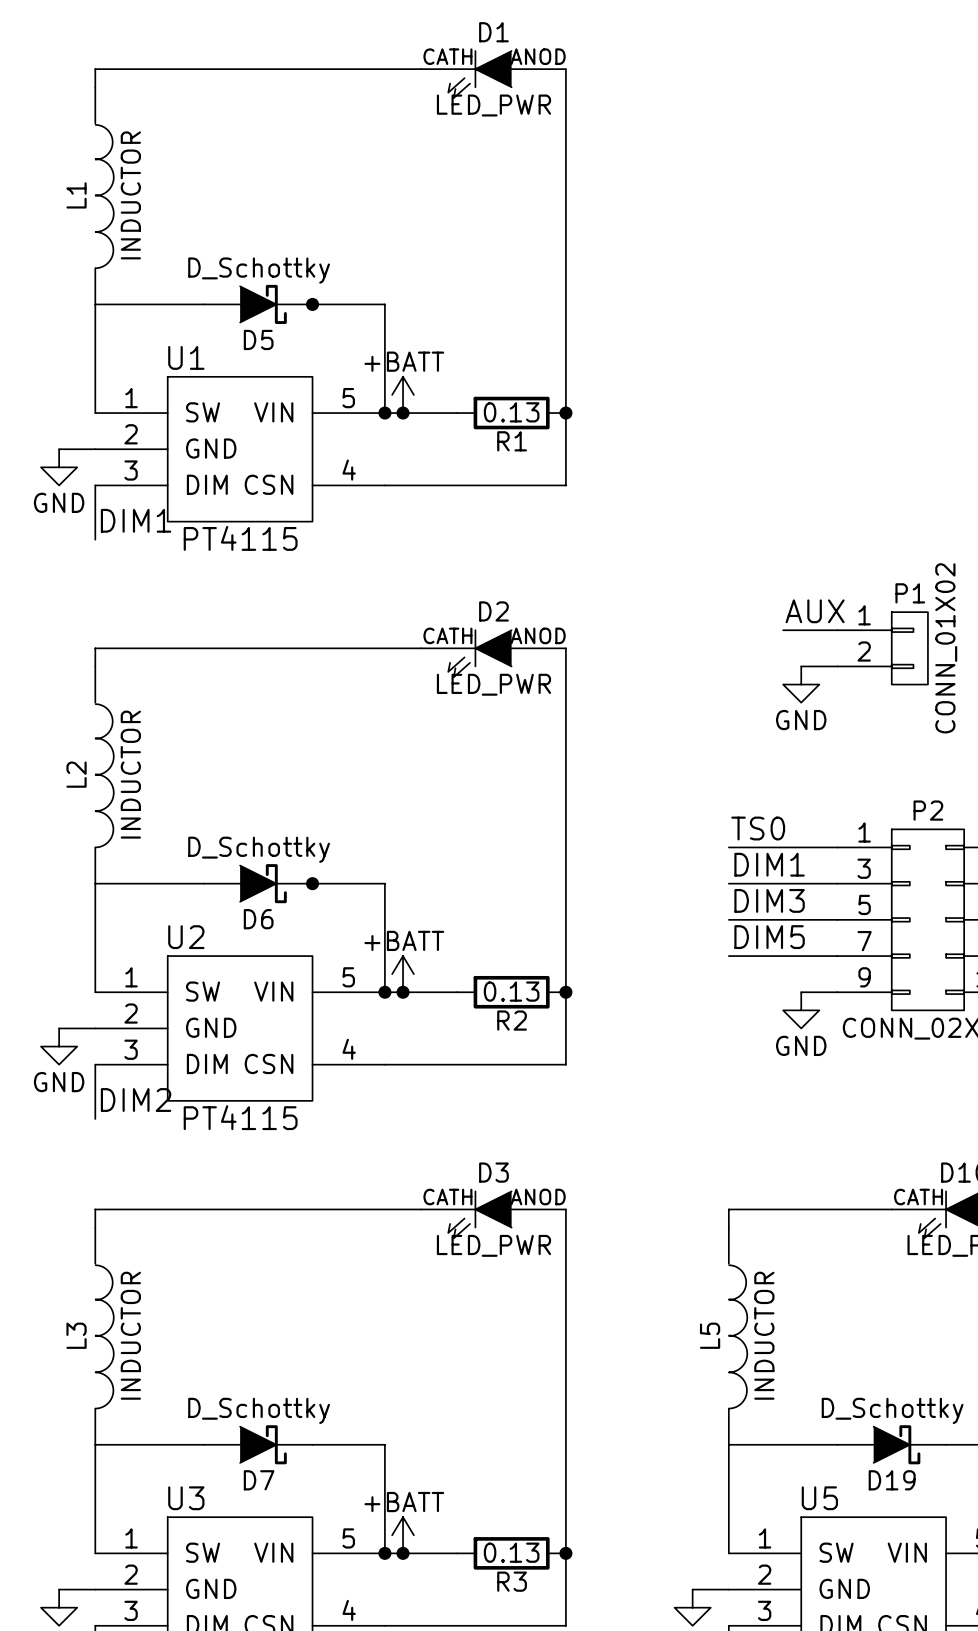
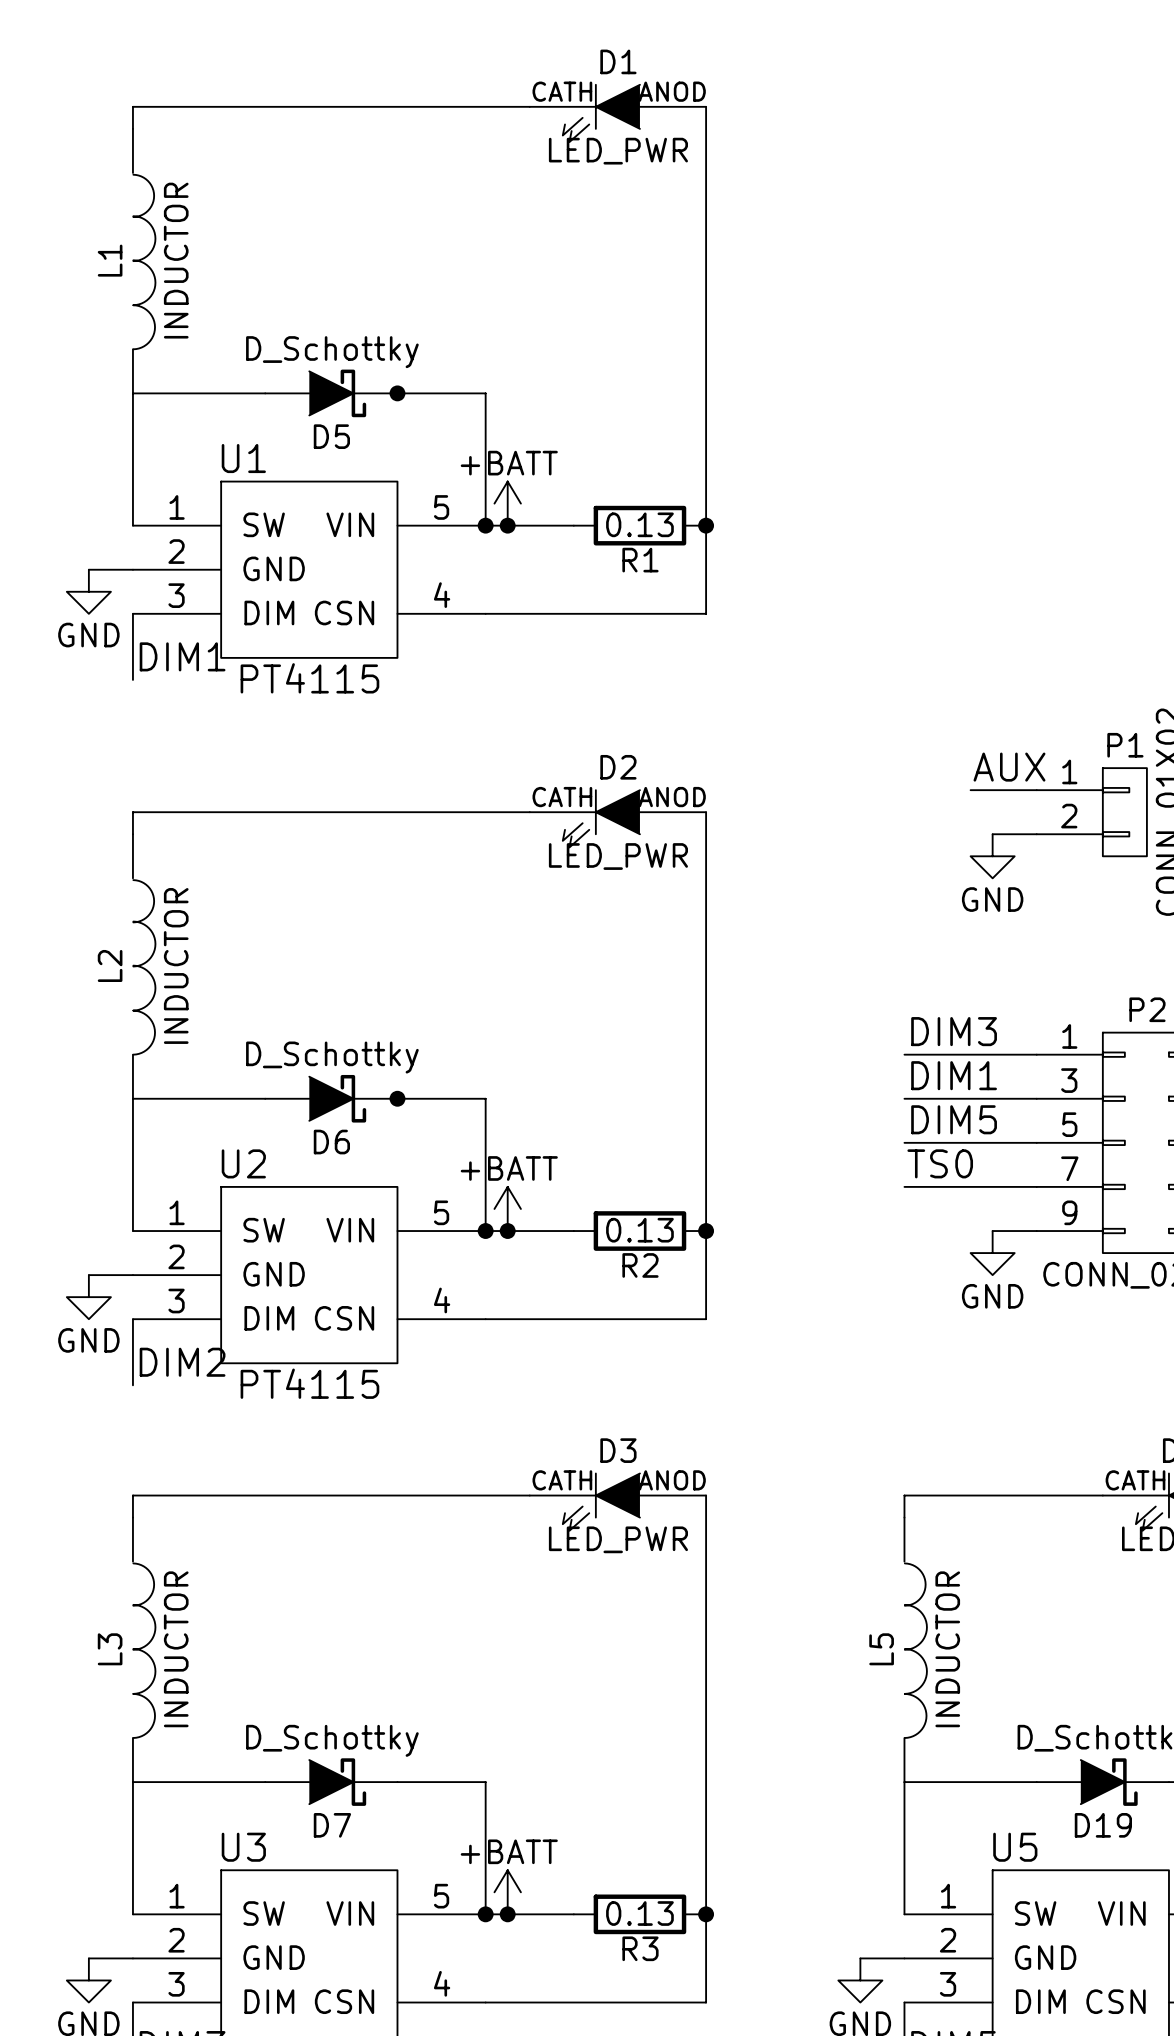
label: TS0 (758, 828) -> DIM3 (954, 1031)
label: DIM3 (769, 900) -> DIM5 (954, 1119)
label: DIM5 (769, 937) -> TS0 (940, 1163)

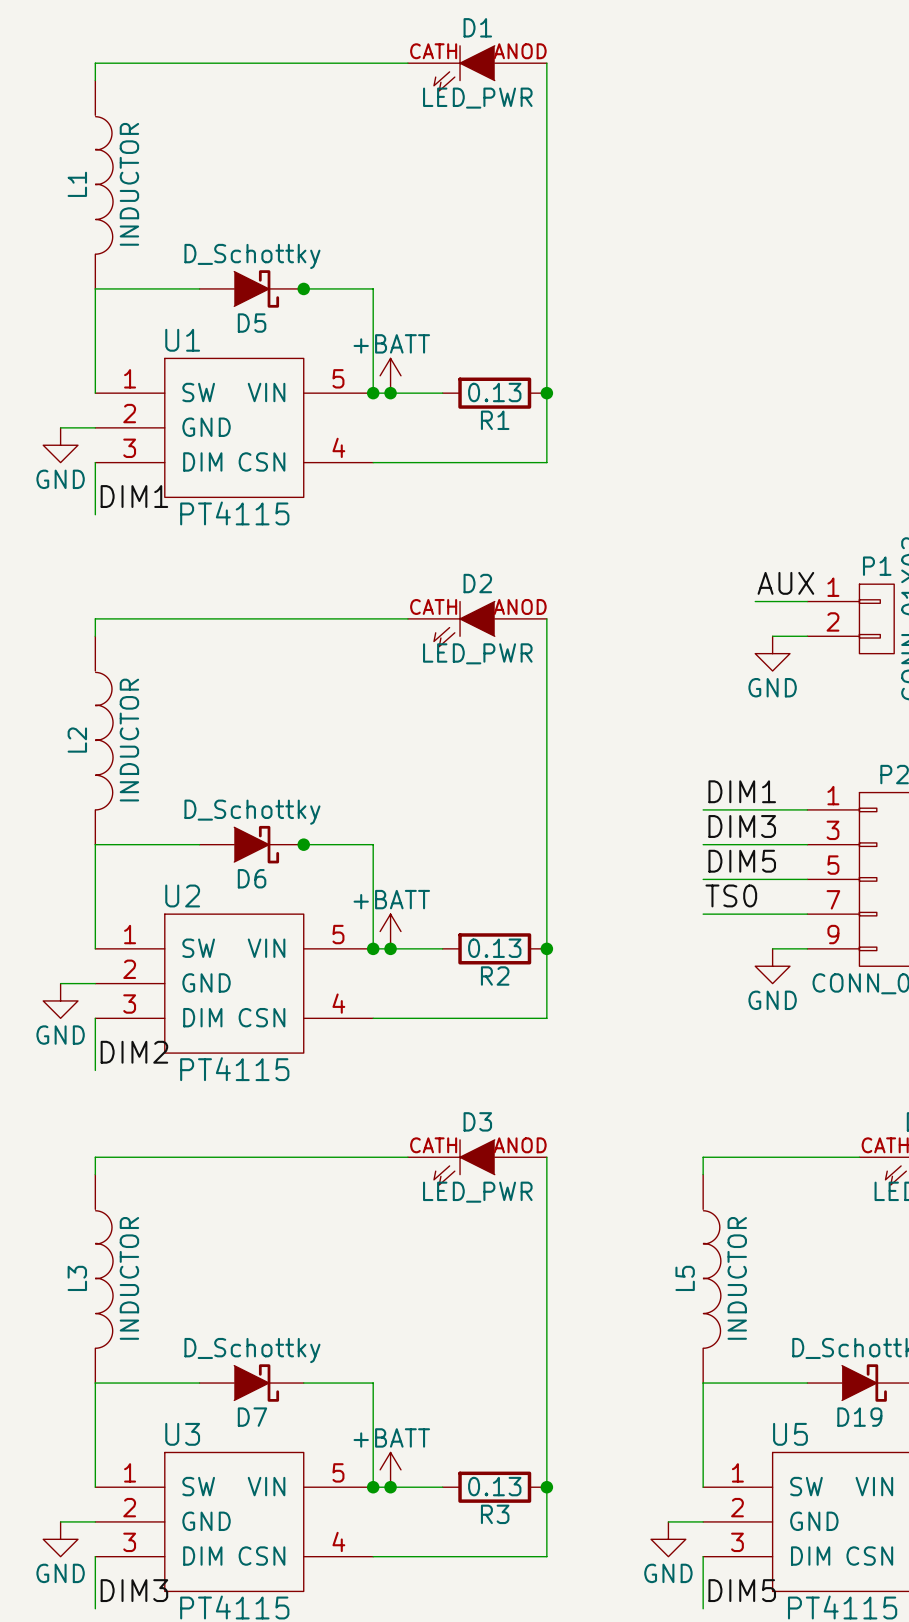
label: DIM3 (954, 1031) -> DIM1 (742, 791)
label: DIM1 (954, 1075) -> DIM3 (742, 826)

